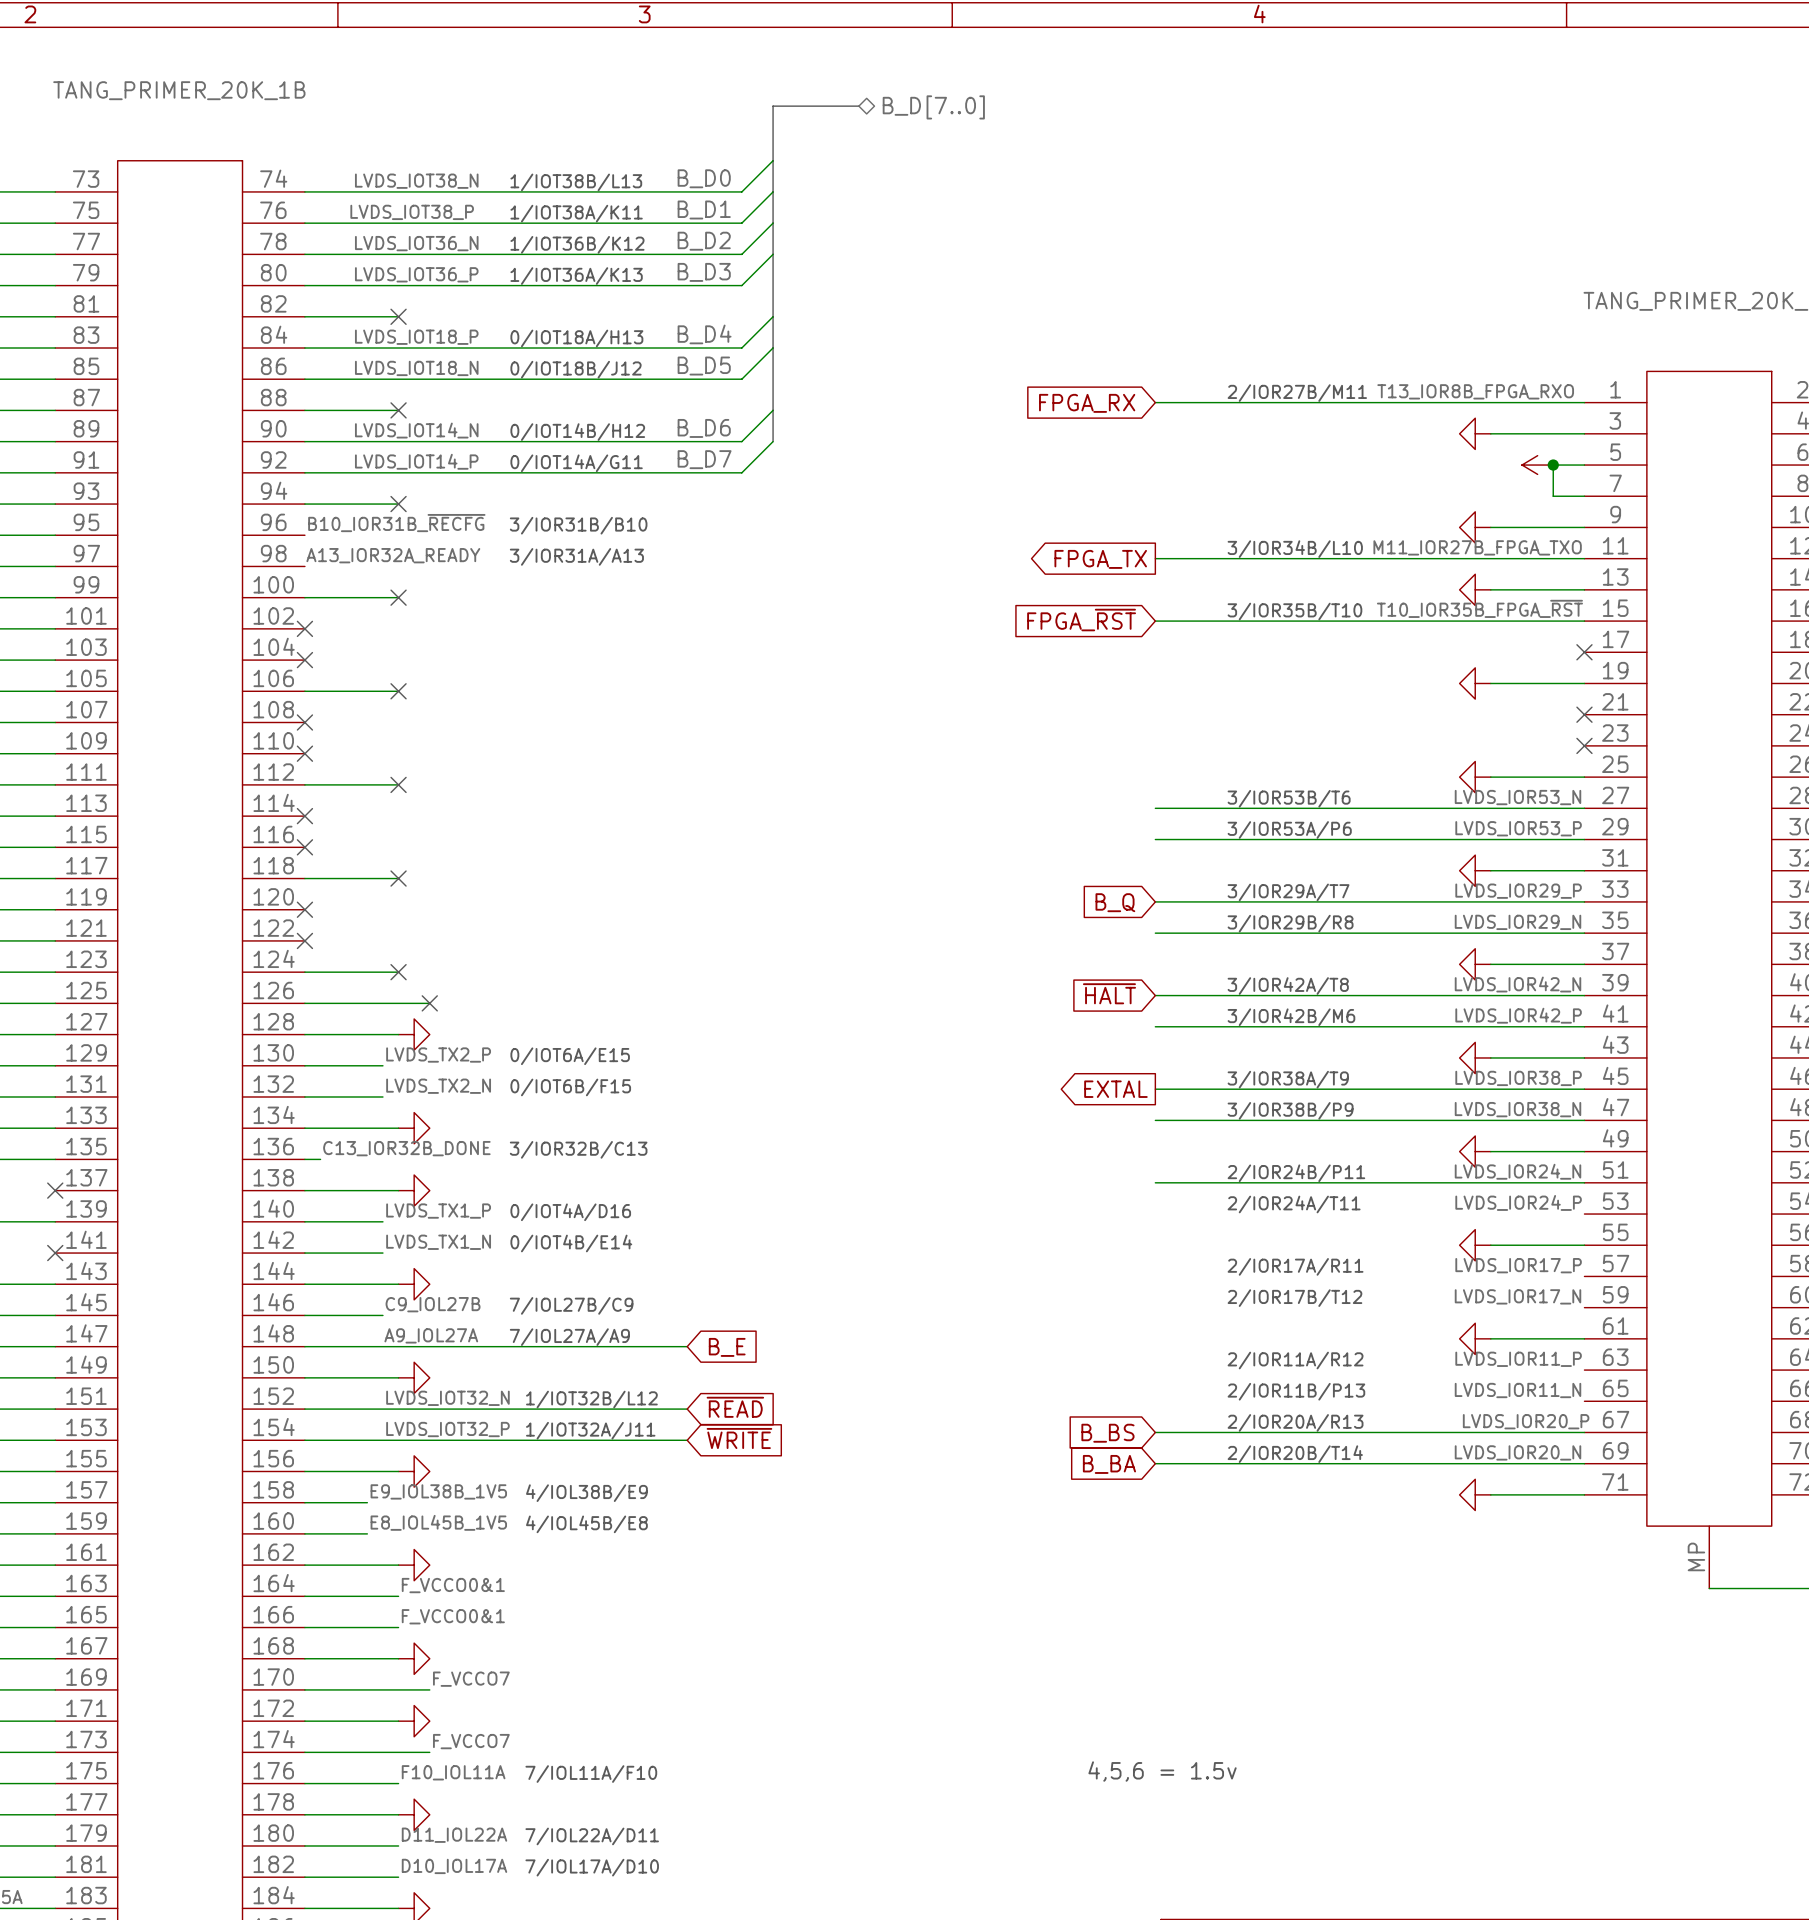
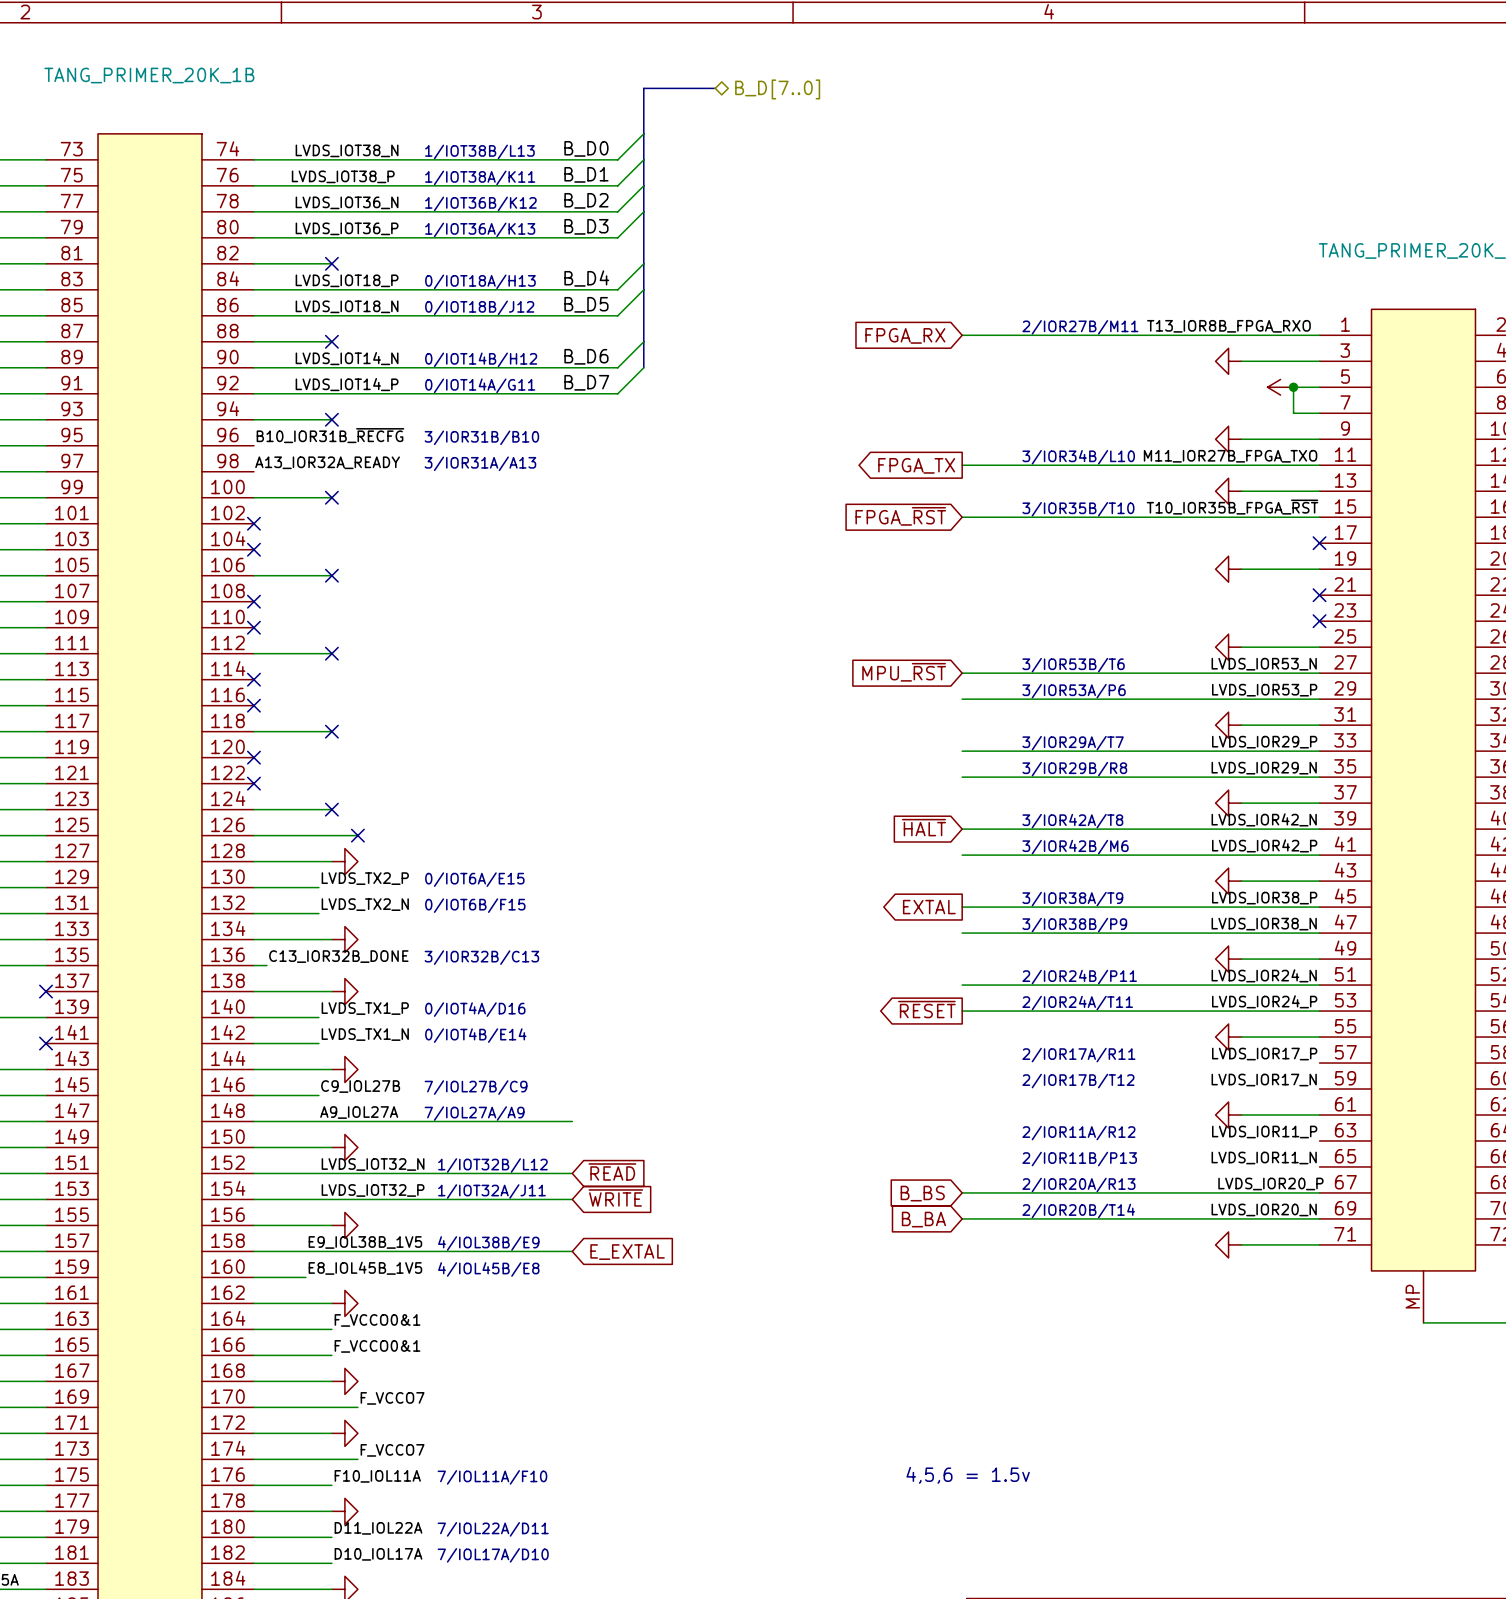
global label: none -> MPU_~{RST} (904, 672)
global label: B_Q (1115, 902) -> none
global label: none -> ~{RESET} (926, 1009)
wire: none -> (962, 1011) (1319, 1011)
global label: B_E (727, 1347) -> none
wire: none -> (305, 1251) (572, 1251)
global label: none -> E_EXTAL (627, 1252)

